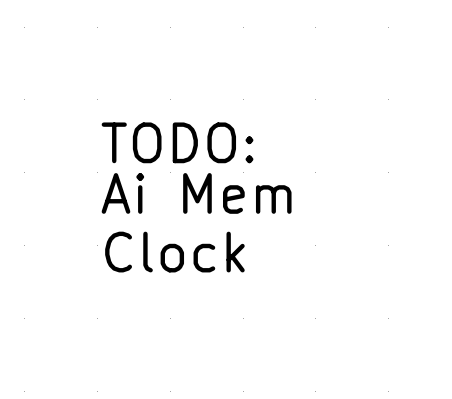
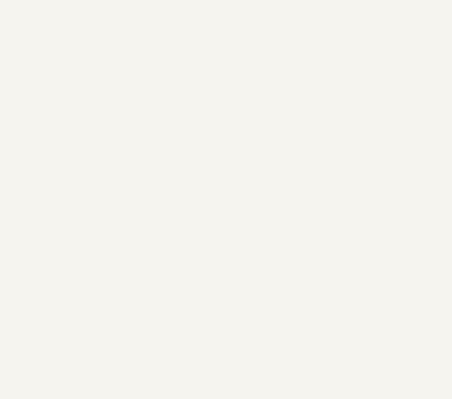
text: TODO: (177, 142) -> none
text: Ai Mem (196, 193) -> none
text: Clock (174, 252) -> none

